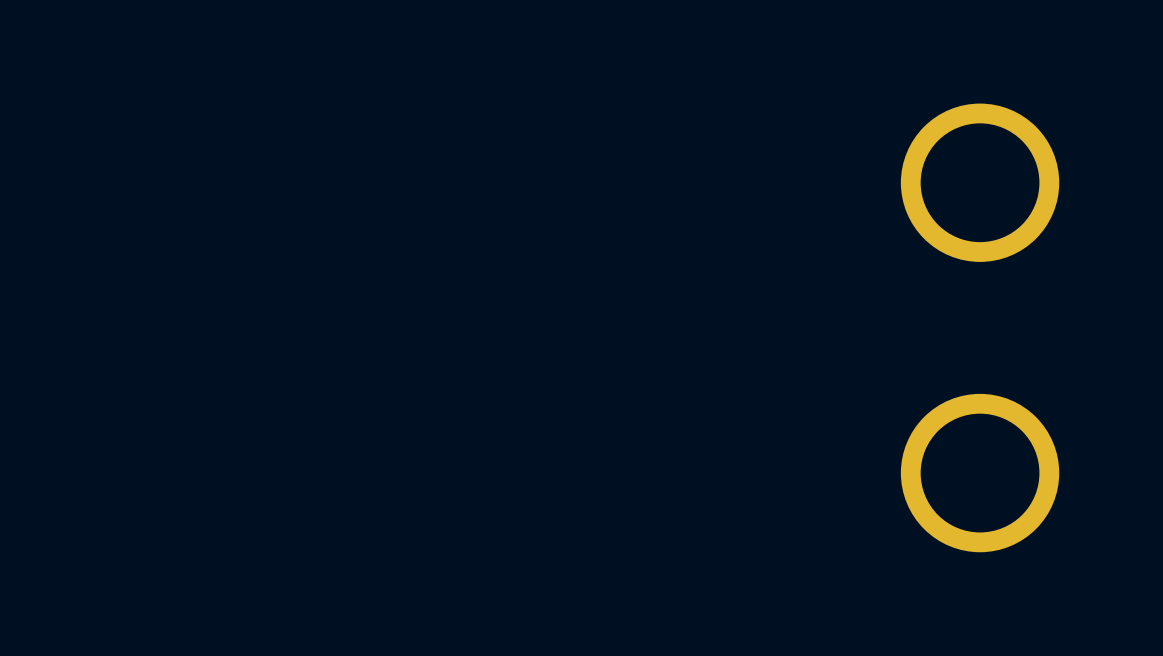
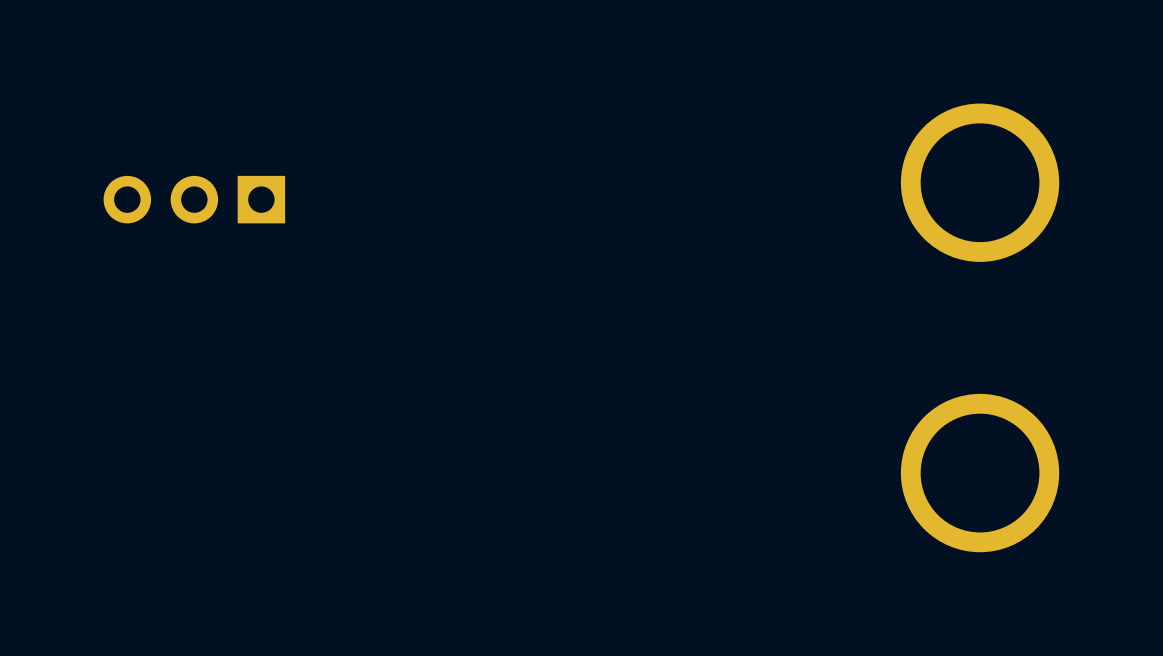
part: none -> (194, 199)

